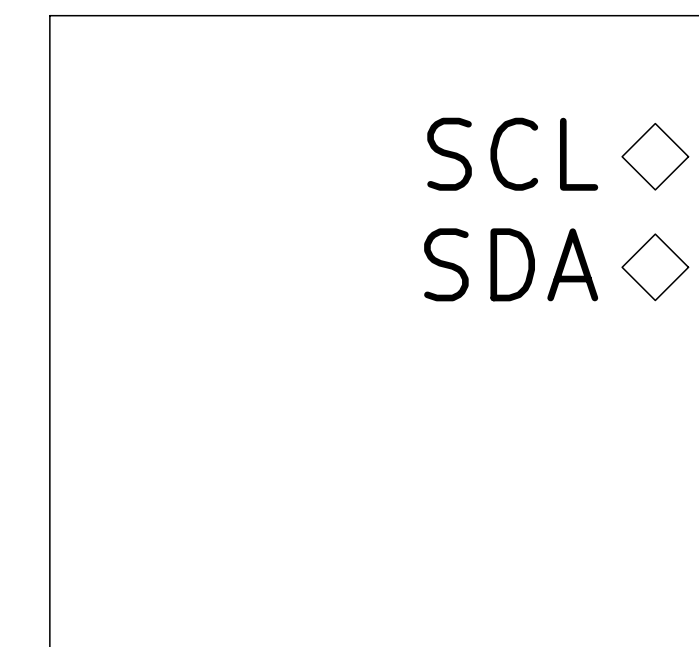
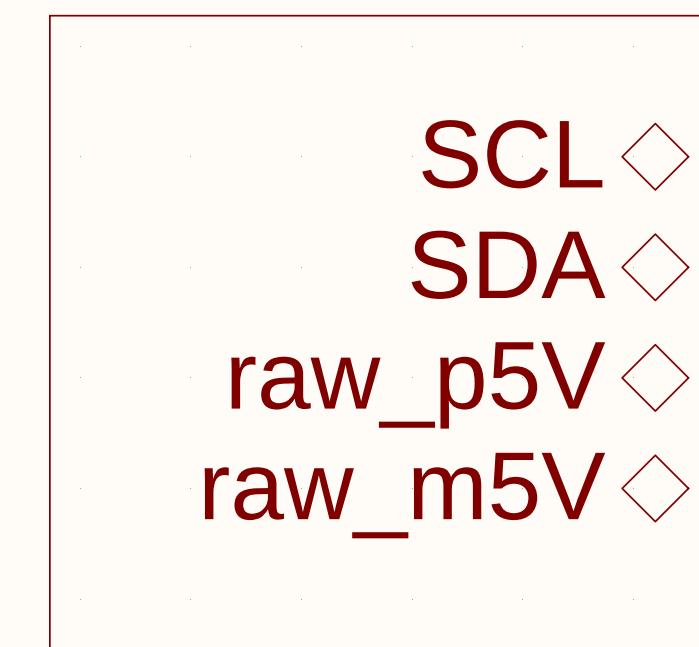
hierarchical label: none -> raw_p5V (418, 385)
hierarchical label: none -> raw_m5V (404, 495)

